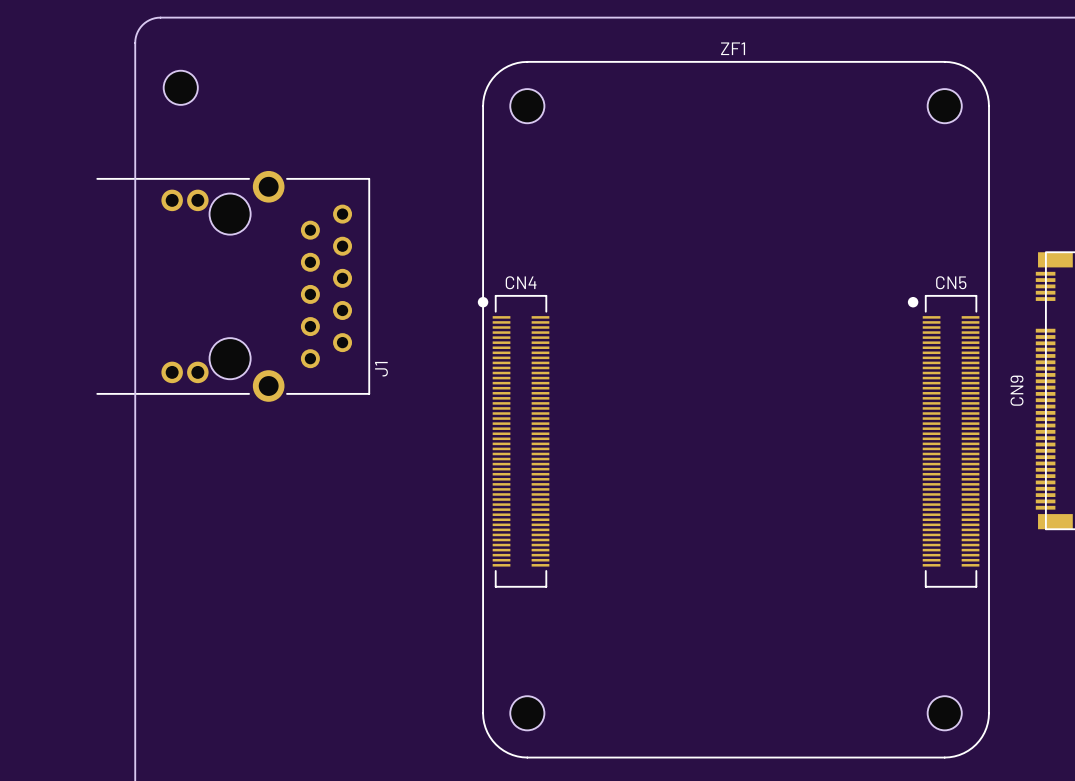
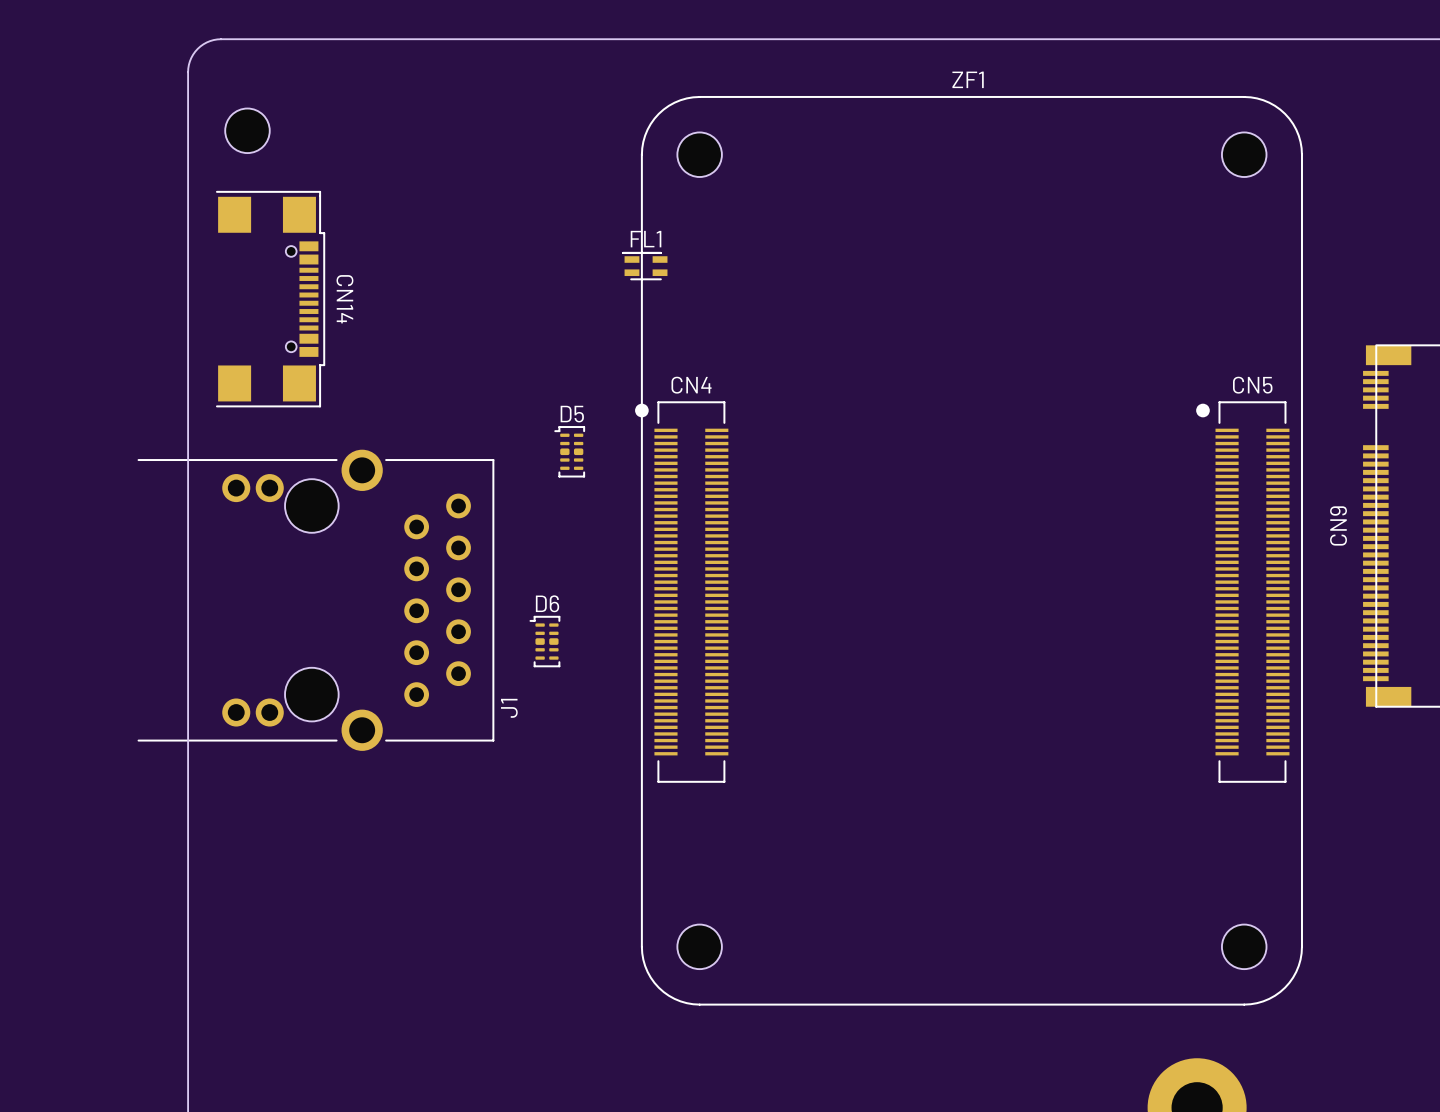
FL1: none -> (644, 266)
CN14: none -> (270, 299)
J1 position: (233, 286) -> (315, 600)
D5: none -> (569, 451)
D6: none -> (544, 641)

